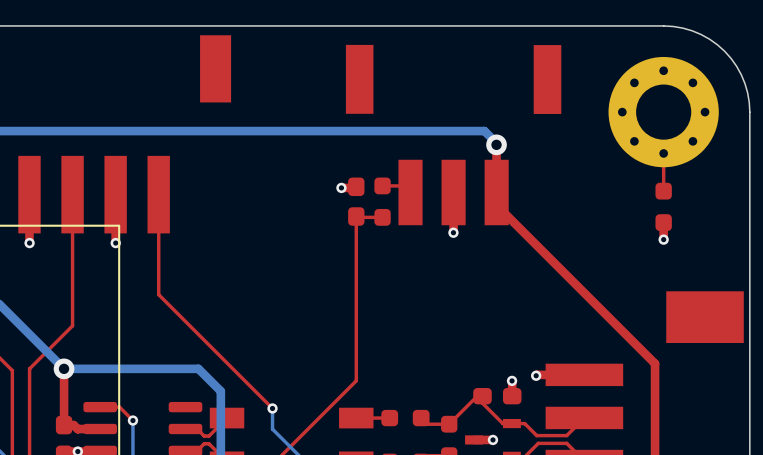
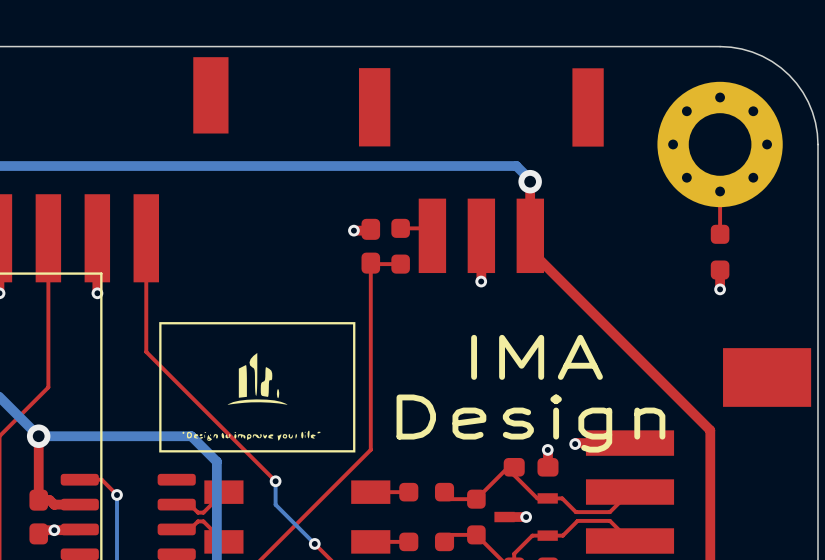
drawing: none -> [159, 322, 356, 453]

